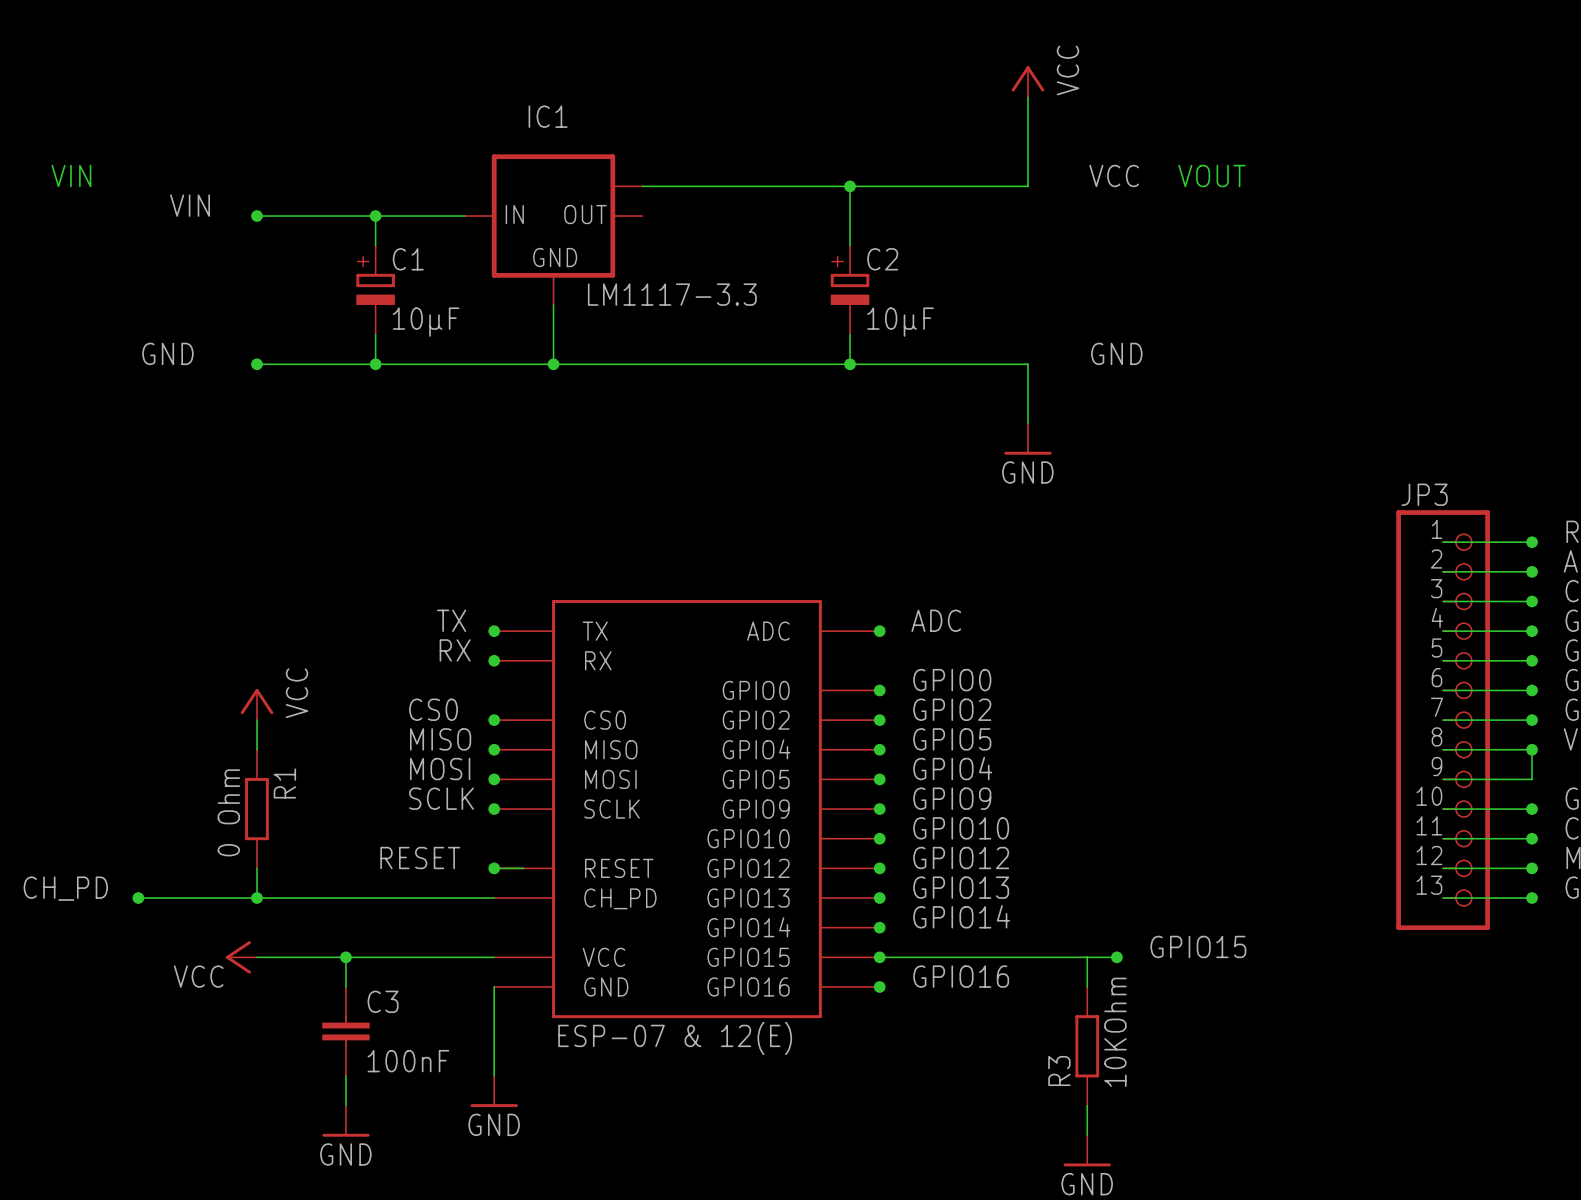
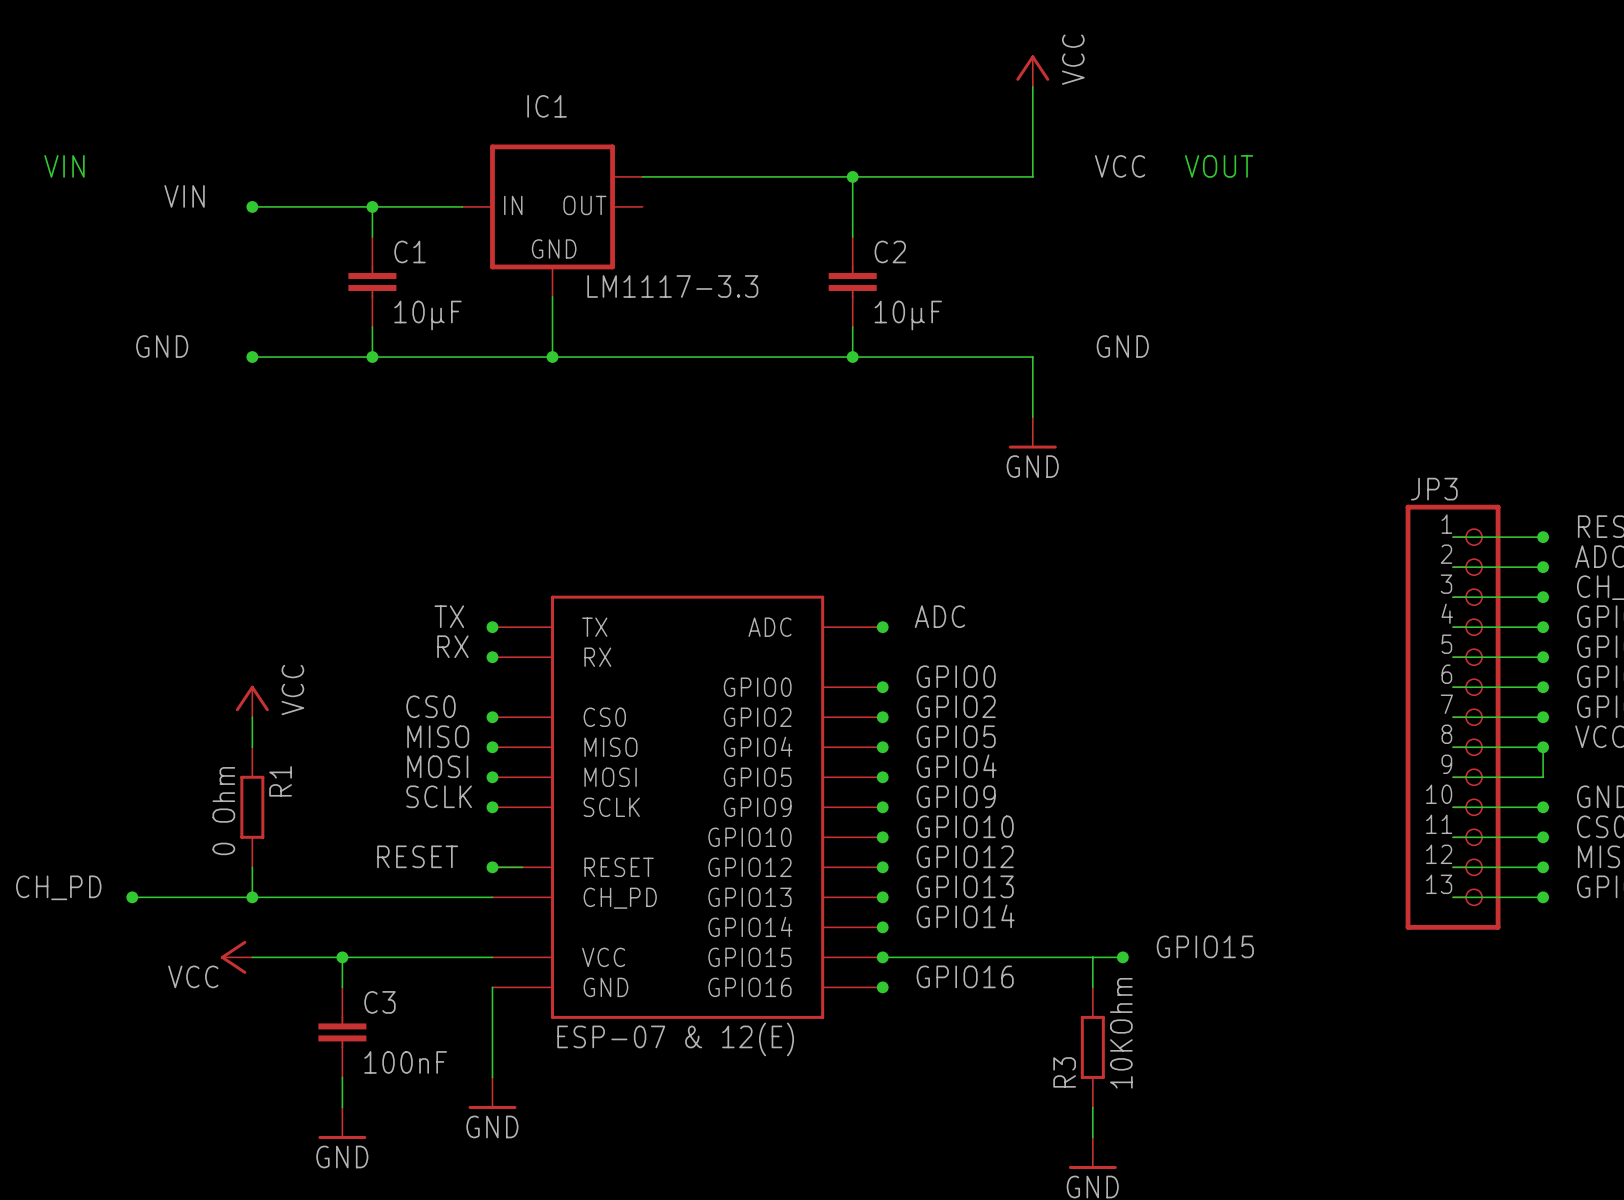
C1 symbol: [356, 245, 395, 335] -> [348, 236, 397, 328]
C2 symbol: [830, 245, 870, 335] -> [828, 236, 877, 328]

